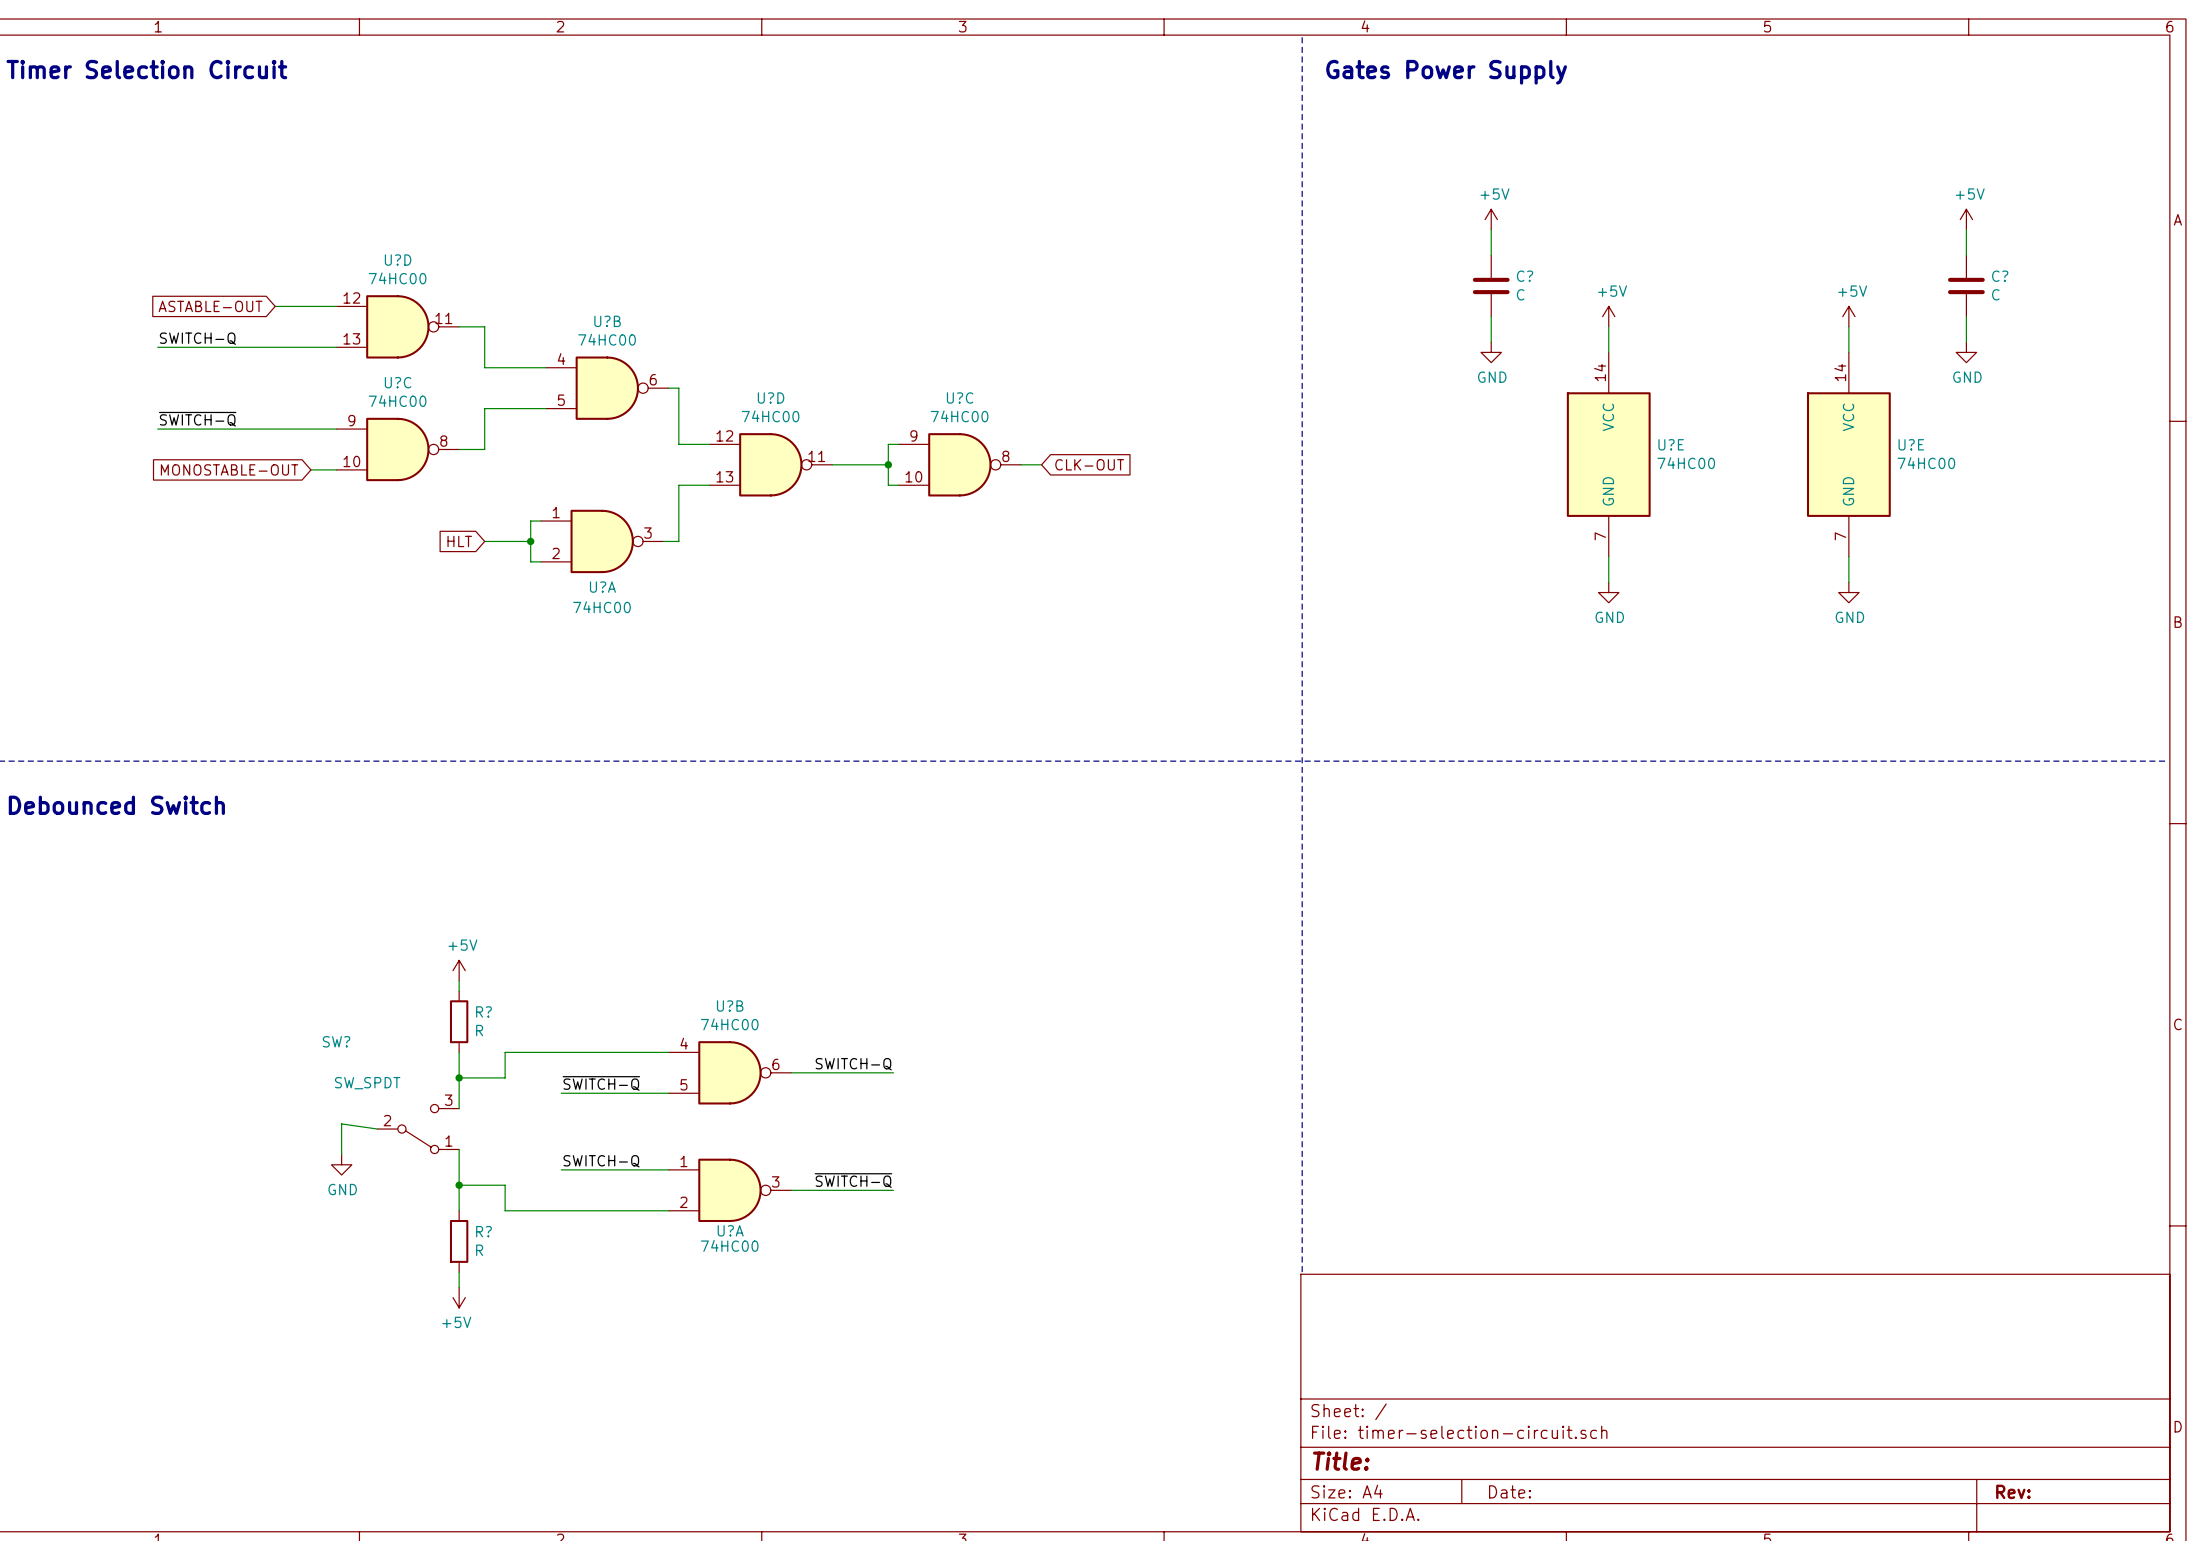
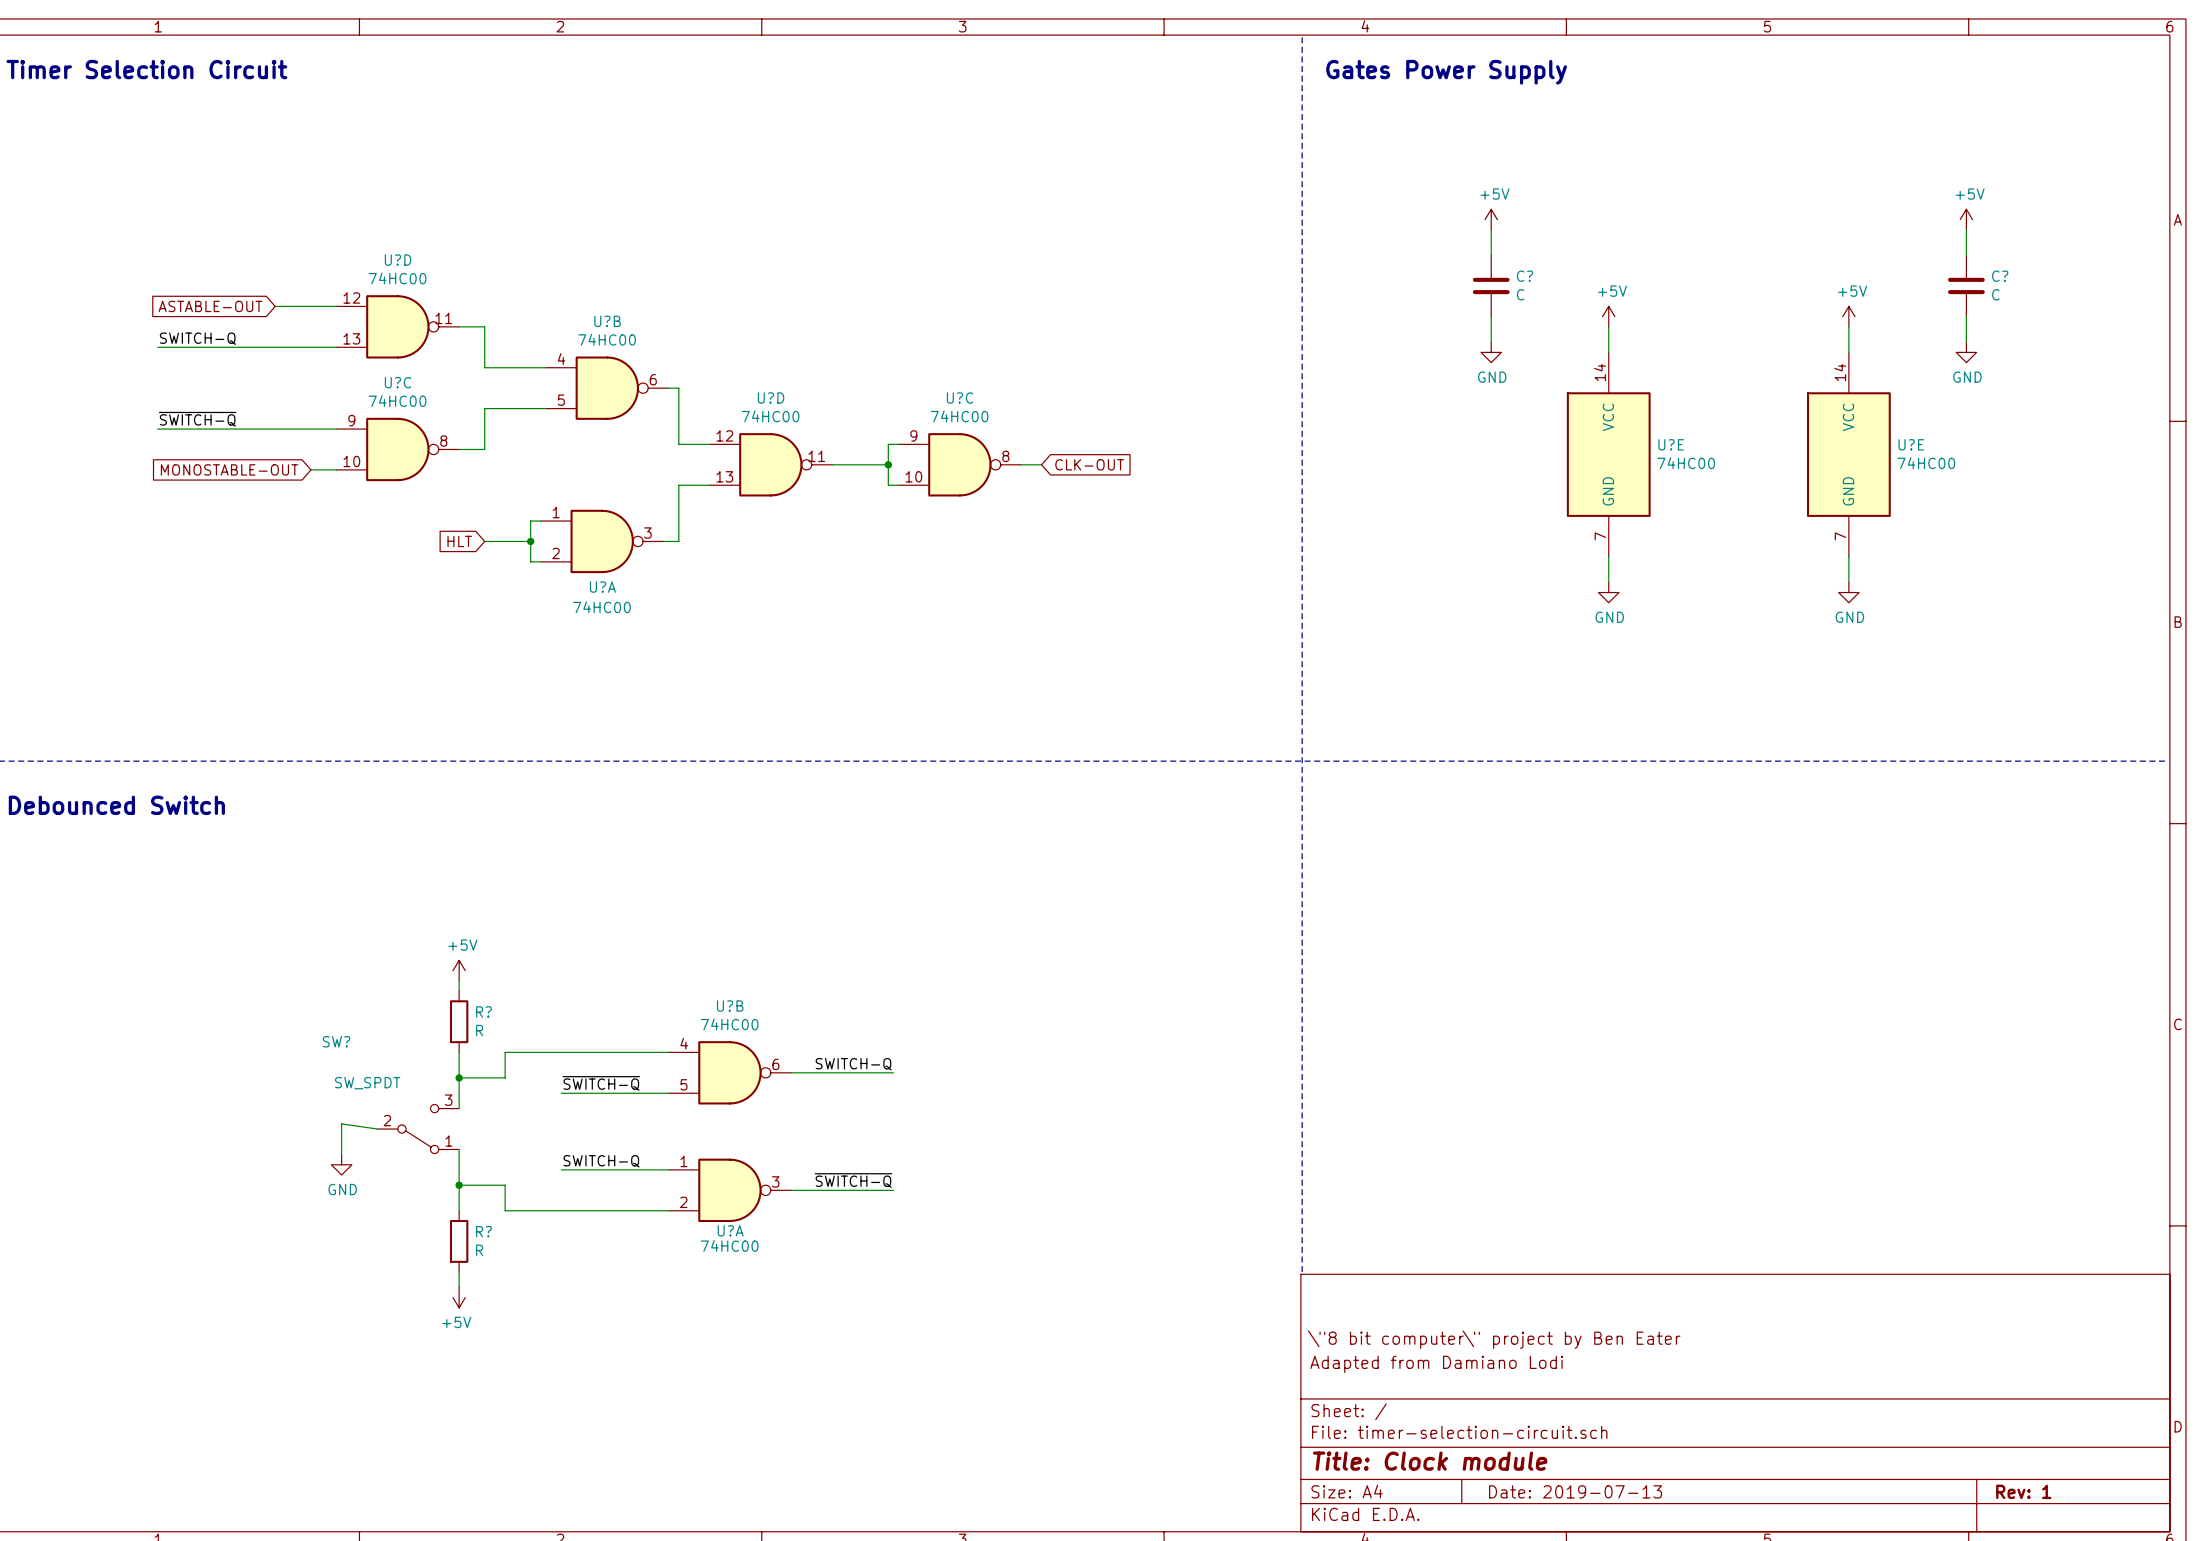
title block: none -> \"8 bit computer\" project by Ben Eater (1494, 1339)
title block: none -> Adapted from Damiano Lodi (1436, 1364)
title block: Title: (1341, 1461) -> Title: Clock module (1430, 1461)
title block: Date: (1510, 1491) -> Date: 2019-07-13 (1575, 1491)
title block: Rev: (2013, 1491) -> Rev: 1 (2023, 1491)

